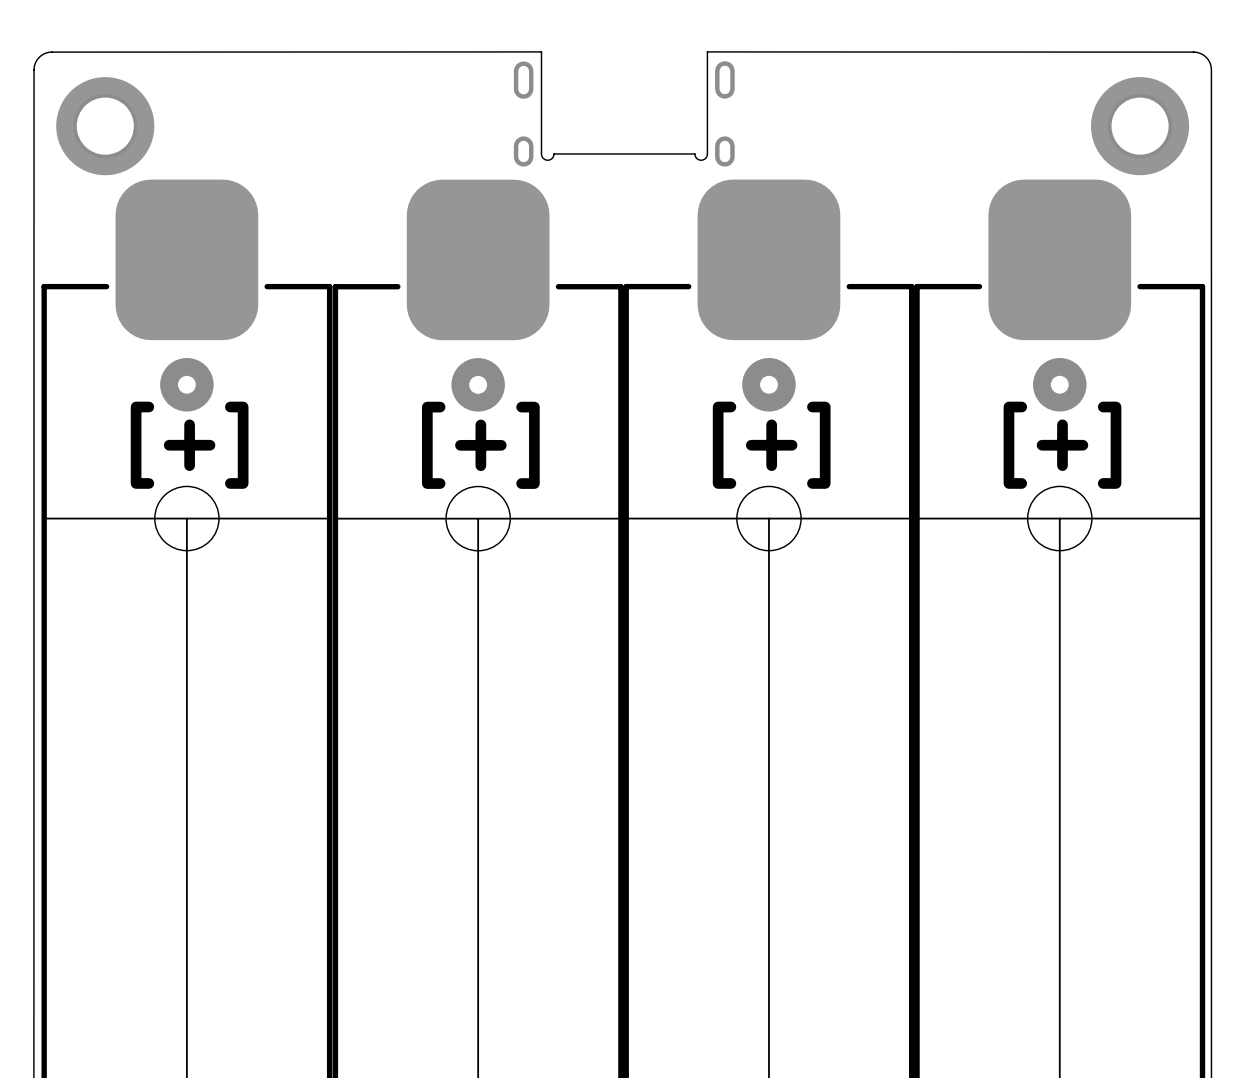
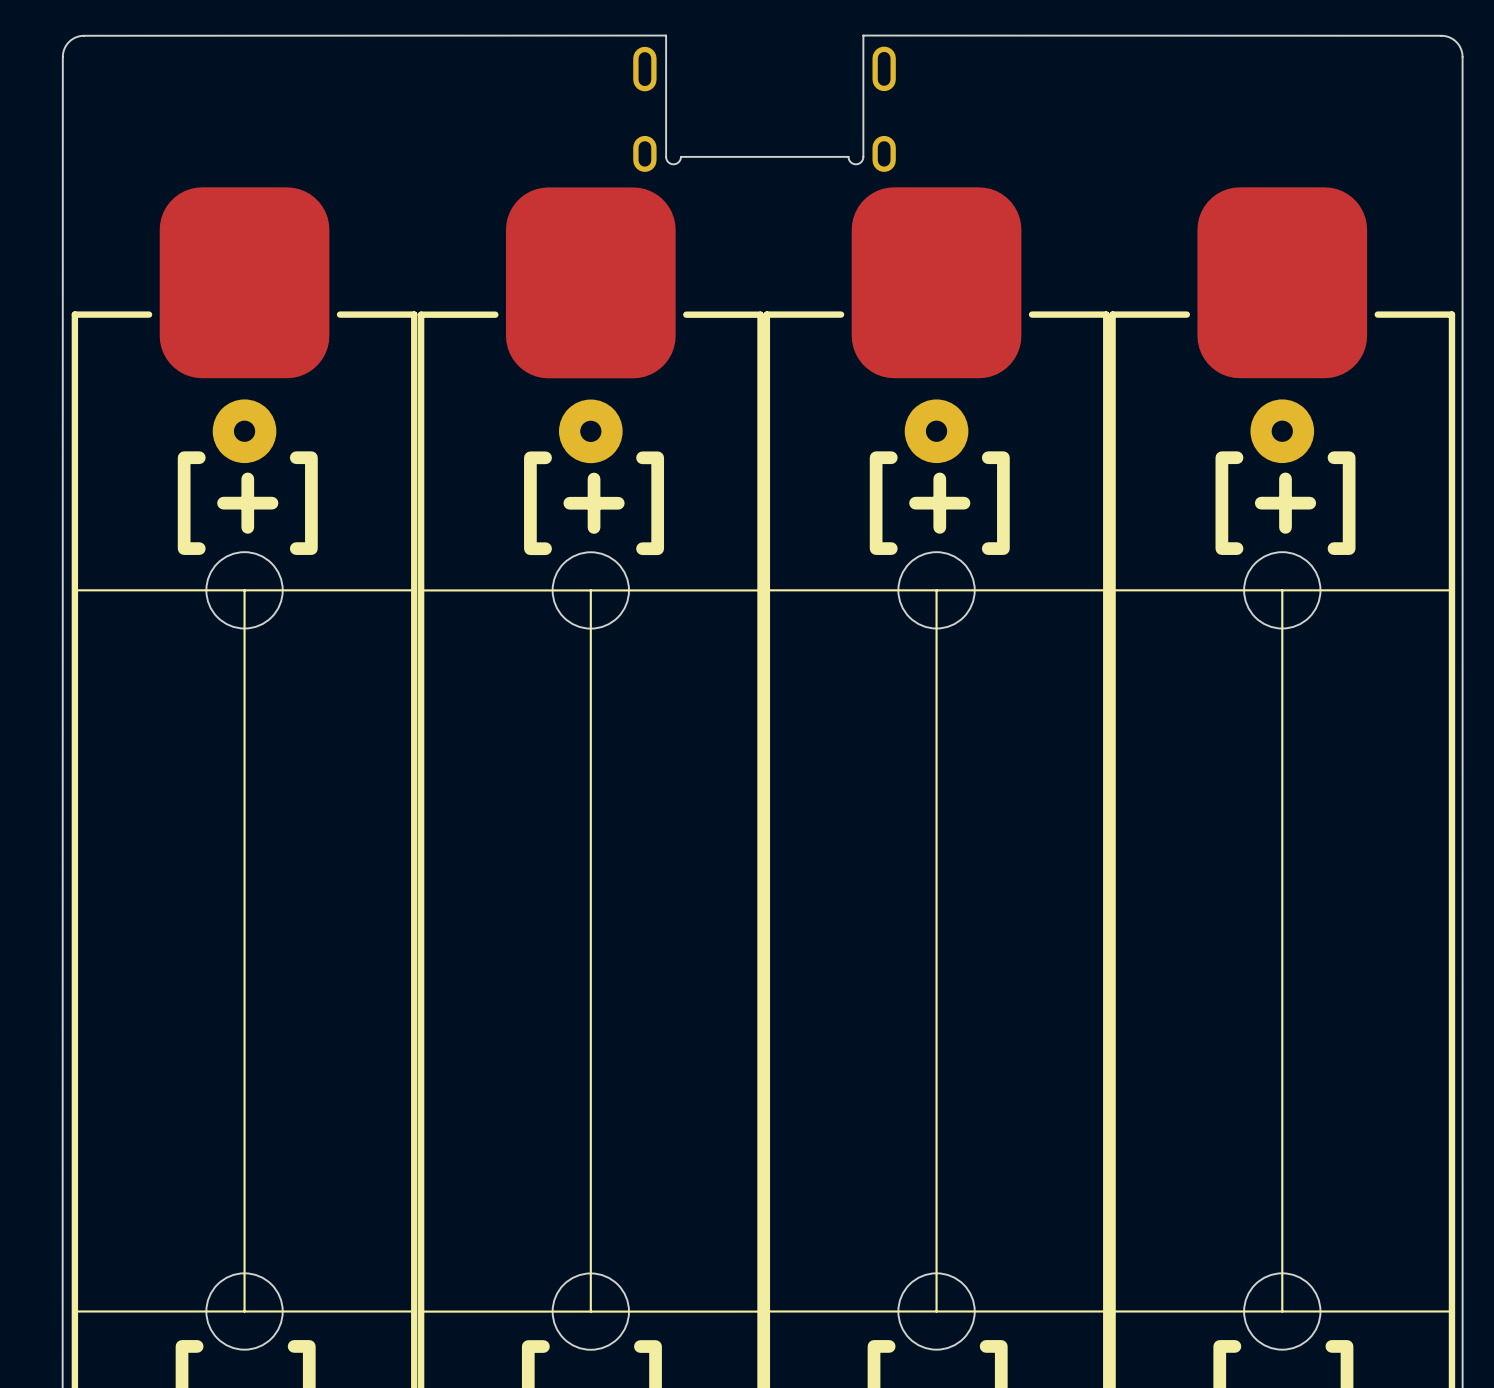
part: (105, 126) -> none
part: (1140, 126) -> none

